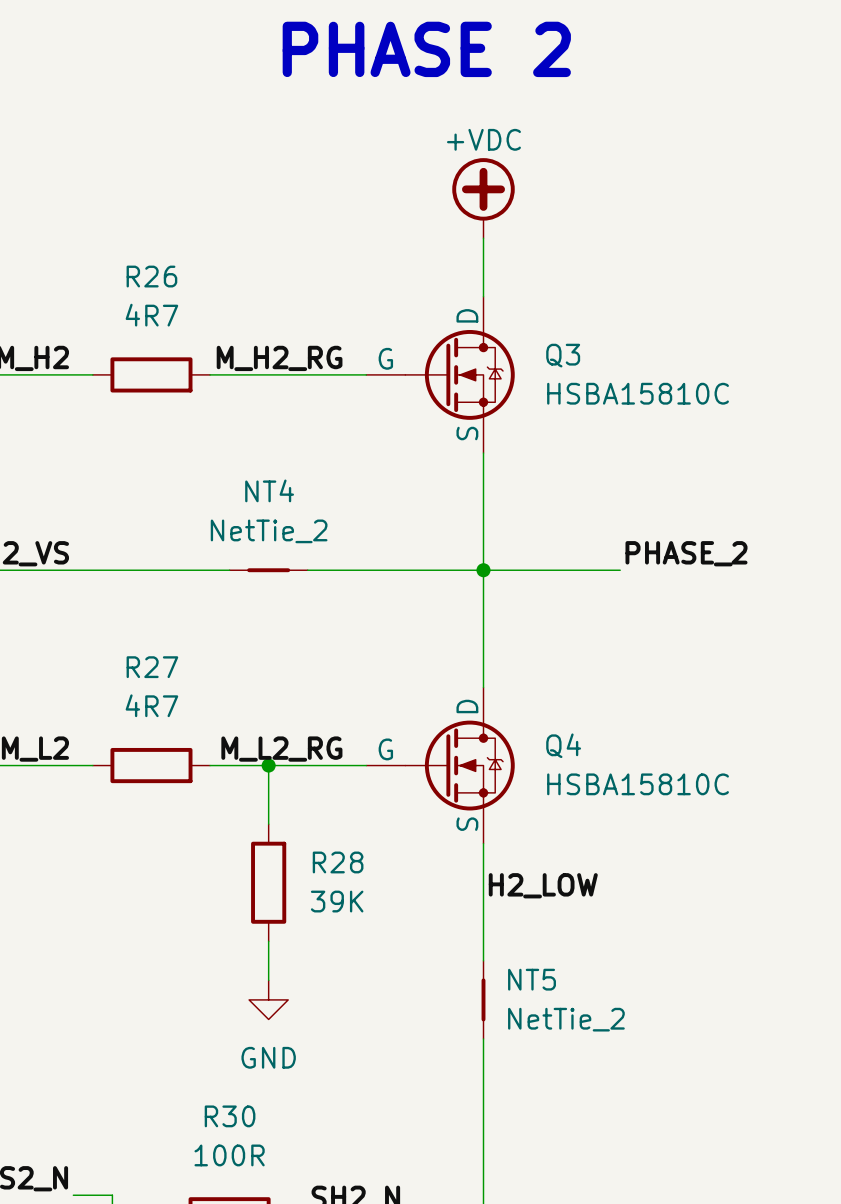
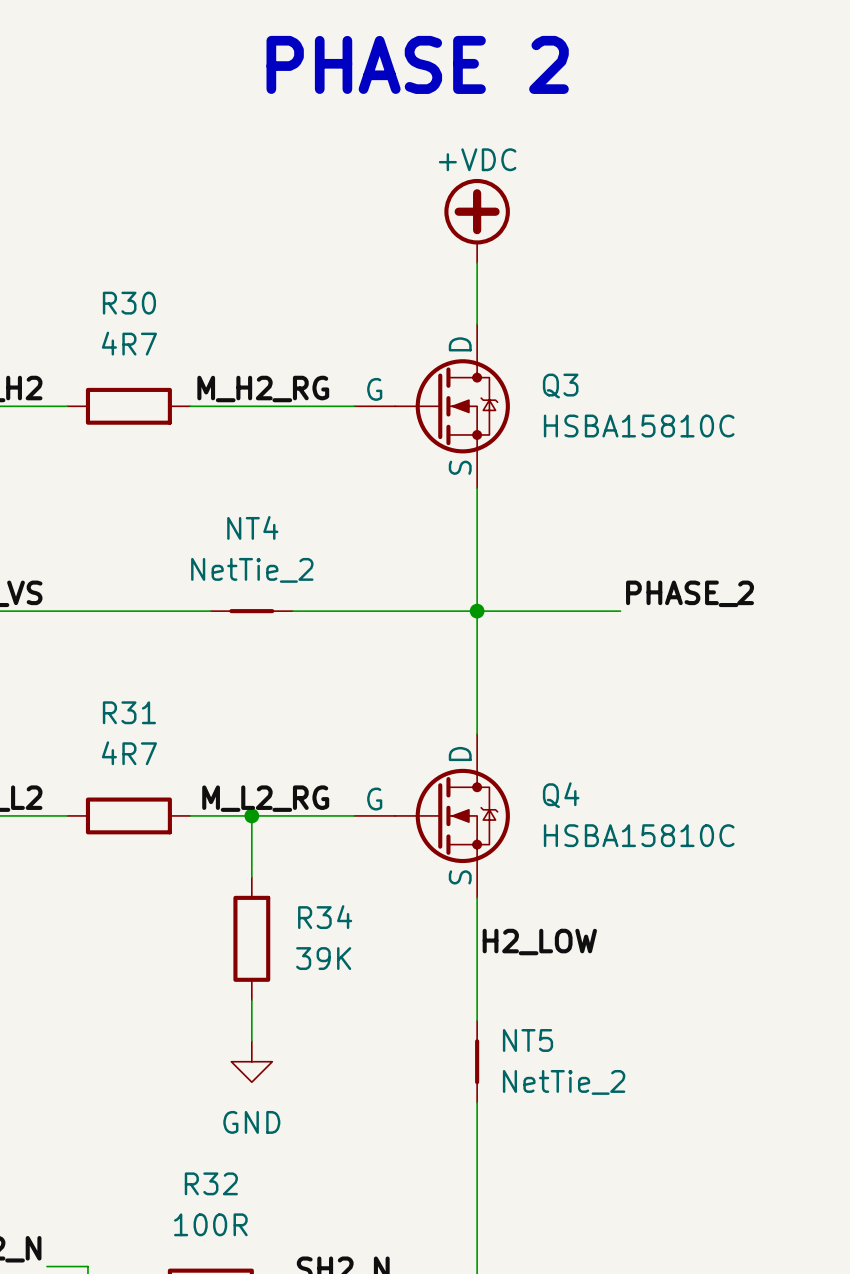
R26 name: R26 (151, 276) -> R30 (129, 303)
R27 name: R27 (152, 667) -> R31 (129, 712)
R28 name: R28 (338, 862) -> R34 (325, 917)
R30 name: R30 (230, 1116) -> R32 (211, 1183)

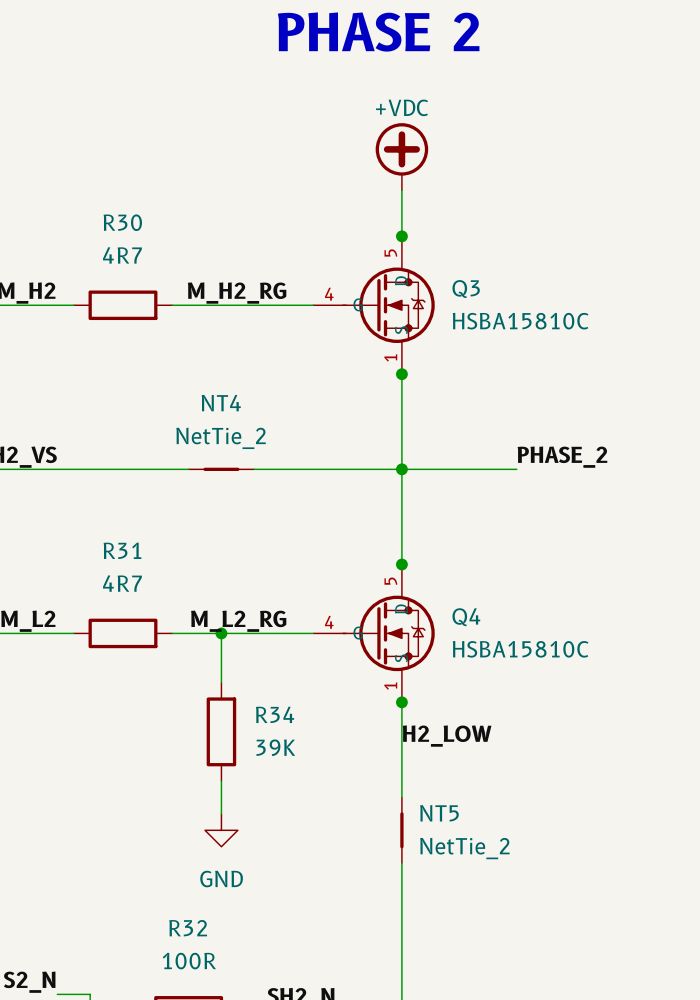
junction: none -> (401, 236)
Q3 symbol: [354, 324, 510, 489] -> [313, 236, 435, 375]
junction: none -> (401, 374)
junction: none -> (401, 564)
Q4 symbol: [354, 734, 510, 898] -> [313, 564, 435, 703]
junction: none -> (401, 702)

